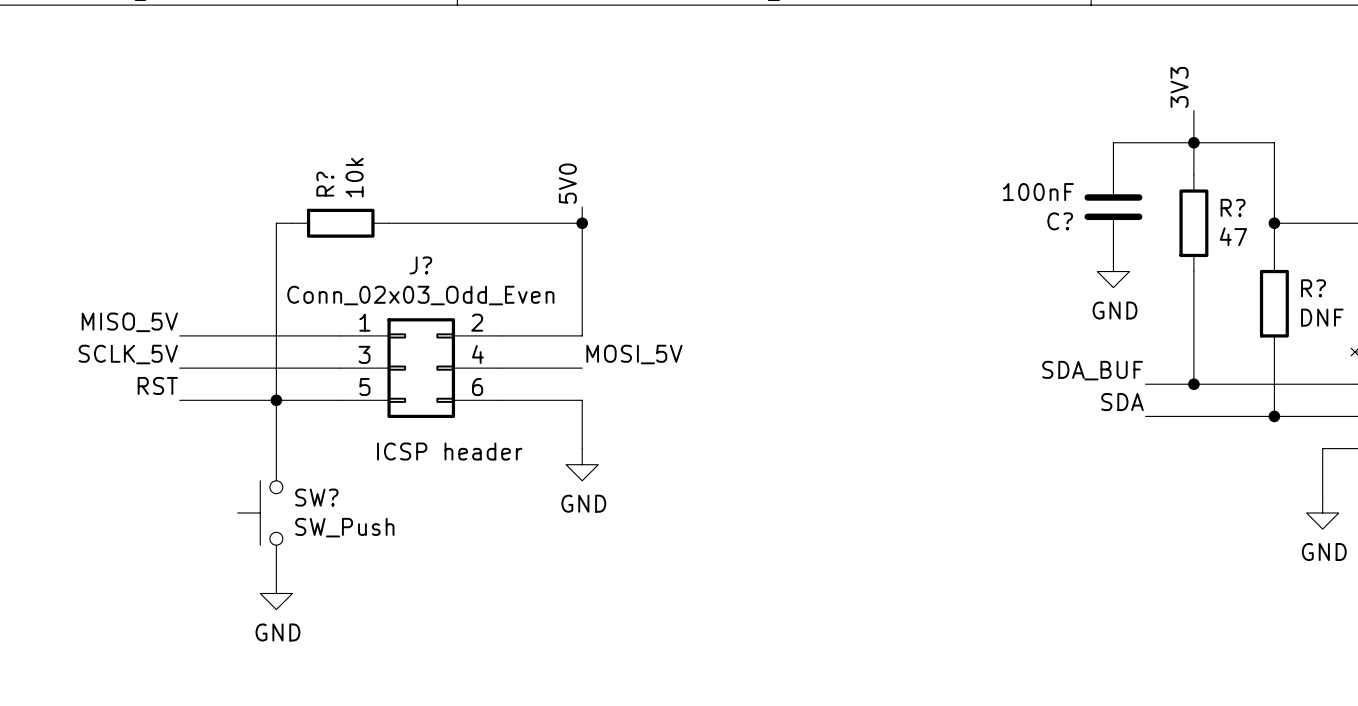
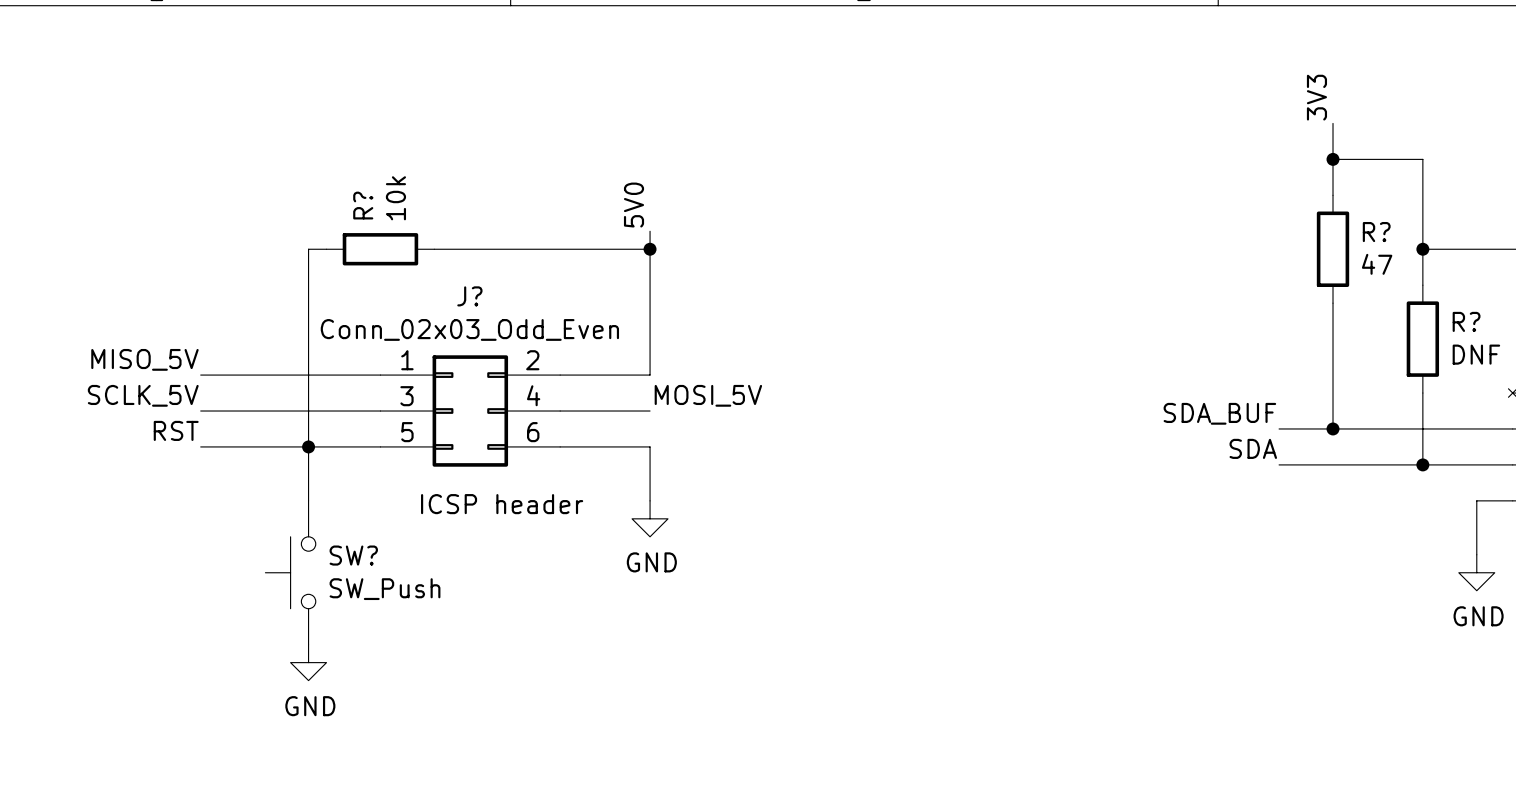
wire: (1193, 142) (1113, 142) (1113, 158) -> none
C?: 100nF (1113, 207) -> none
power symbol: GND (1113, 271) -> none

